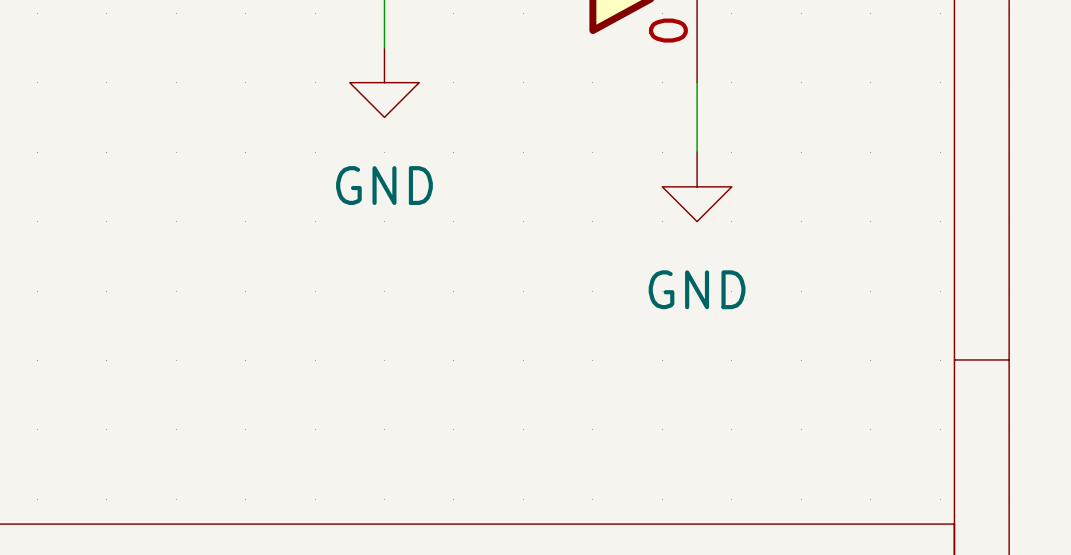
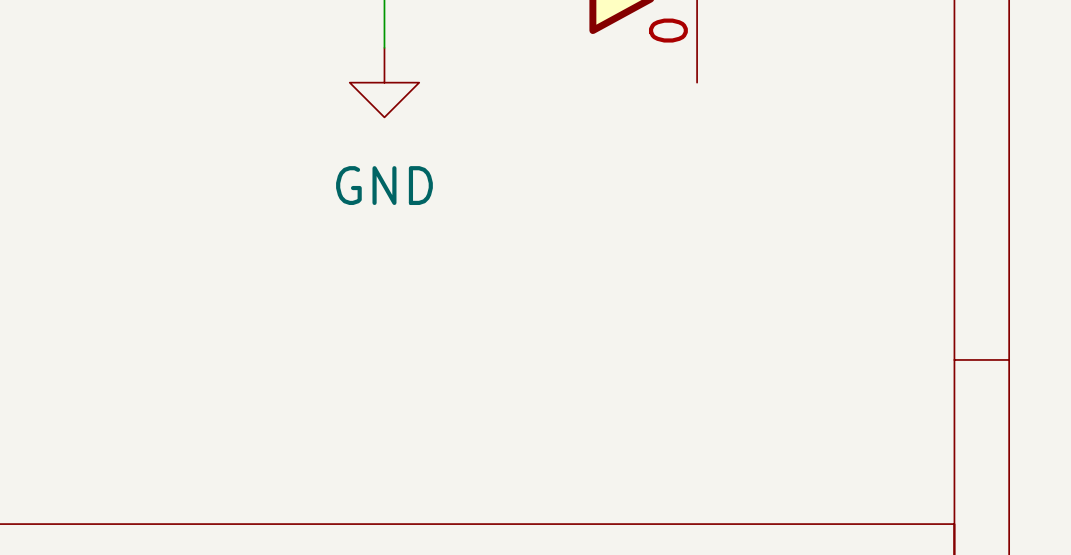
wire: (697, 82) (697, 152) -> none
power symbol: GND (697, 186) -> none

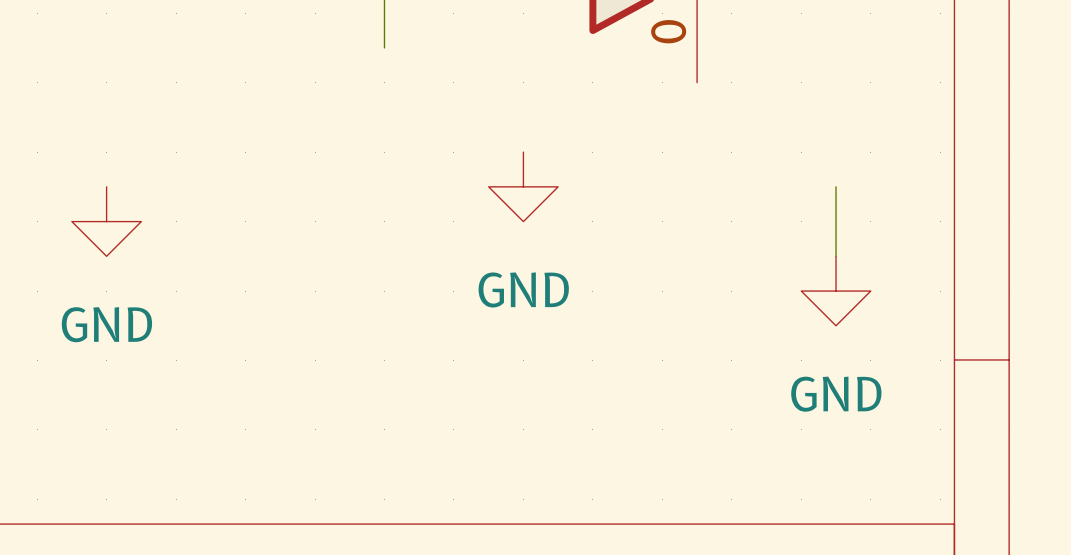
power symbol: GND (384, 82) -> none
power symbol: none -> GND (523, 186)
wire: none -> (836, 186) (836, 256)
power symbol: none -> GND (106, 221)
power symbol: none -> GND (836, 291)

